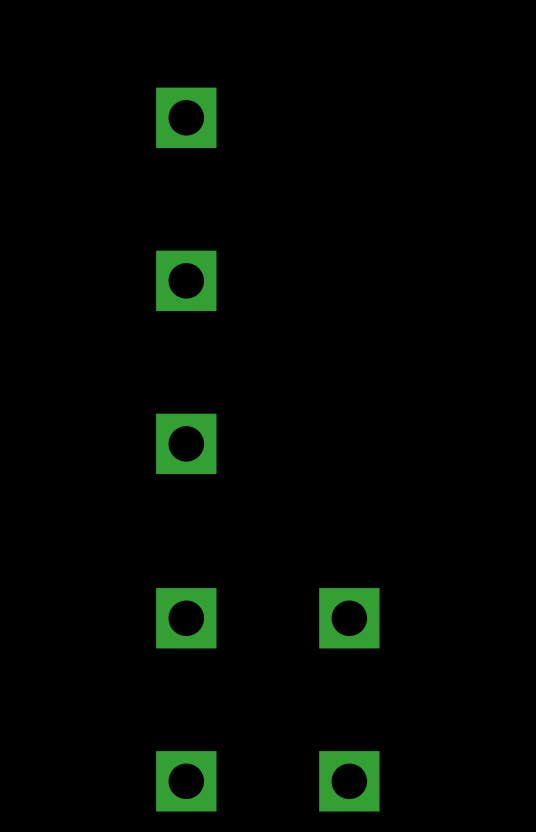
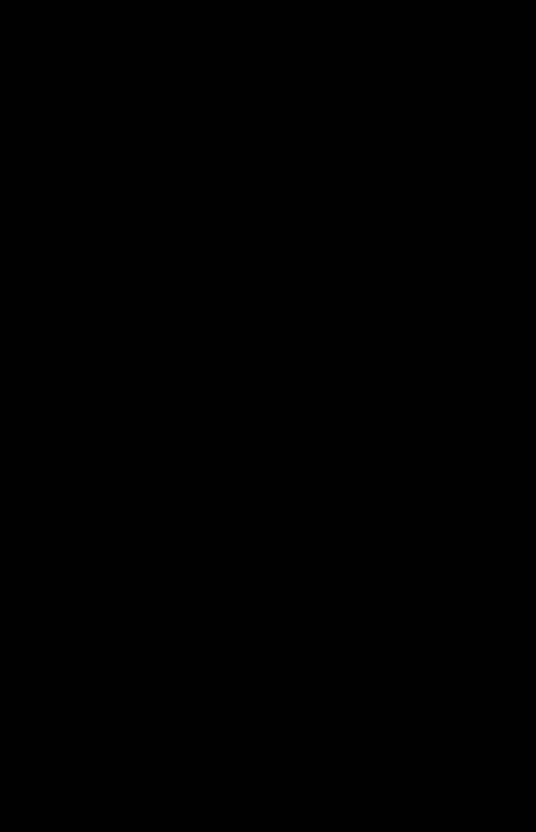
part: (186, 117) -> none
part: (186, 280) -> none
part: (186, 443) -> none
part: (186, 618) -> none
part: (349, 618) -> none
part: (186, 781) -> none
part: (349, 781) -> none

